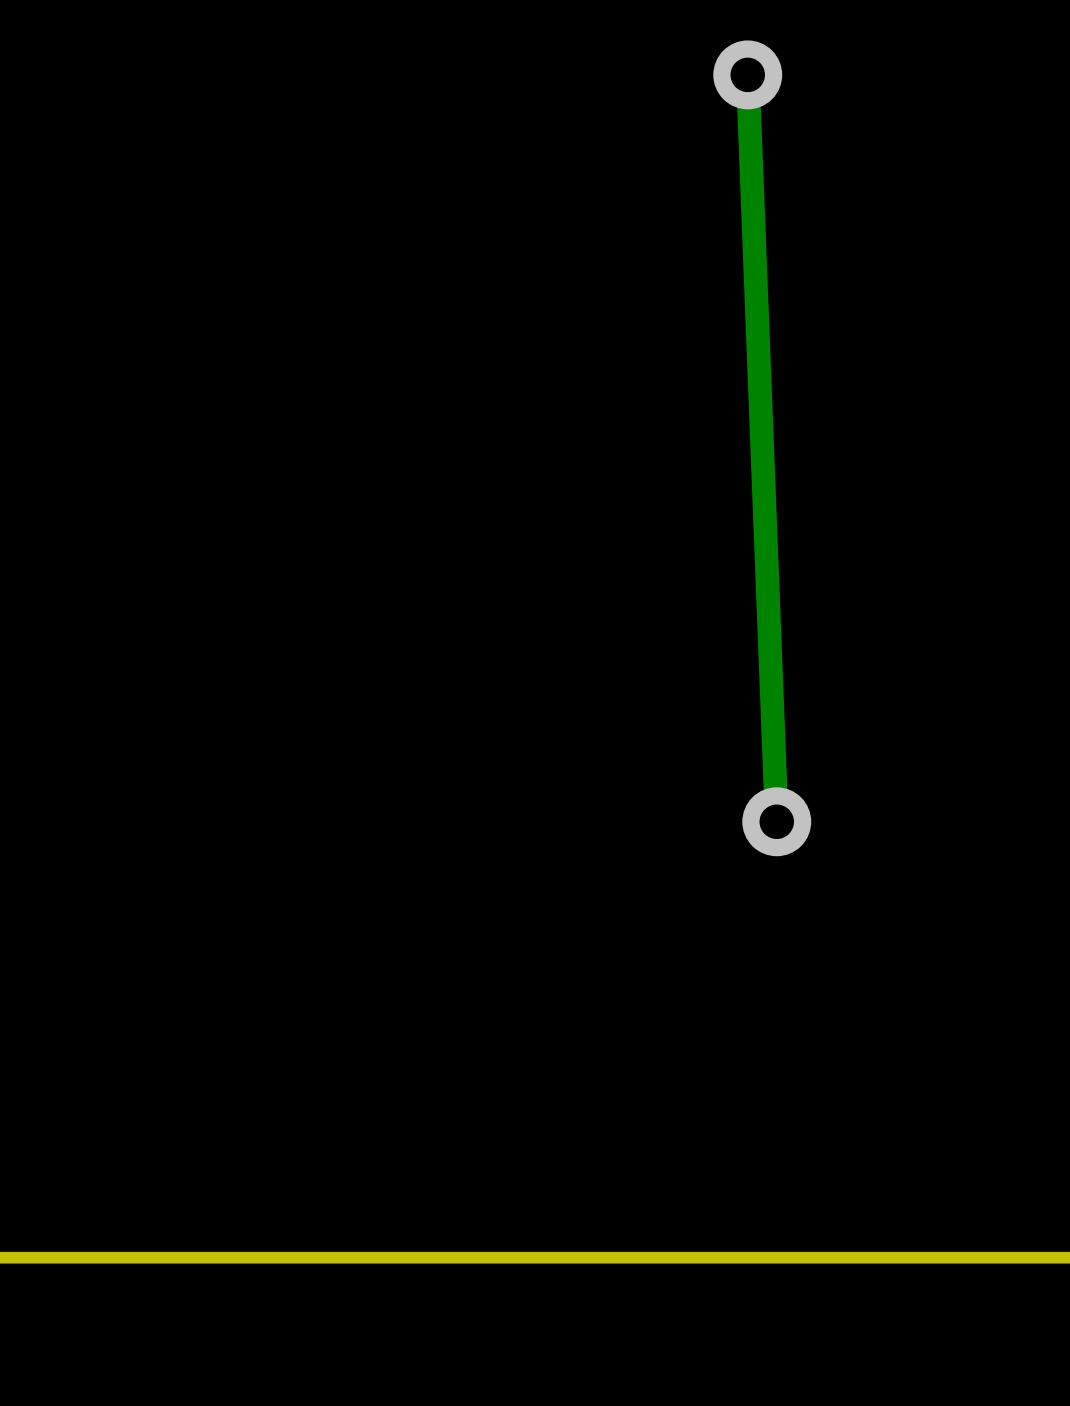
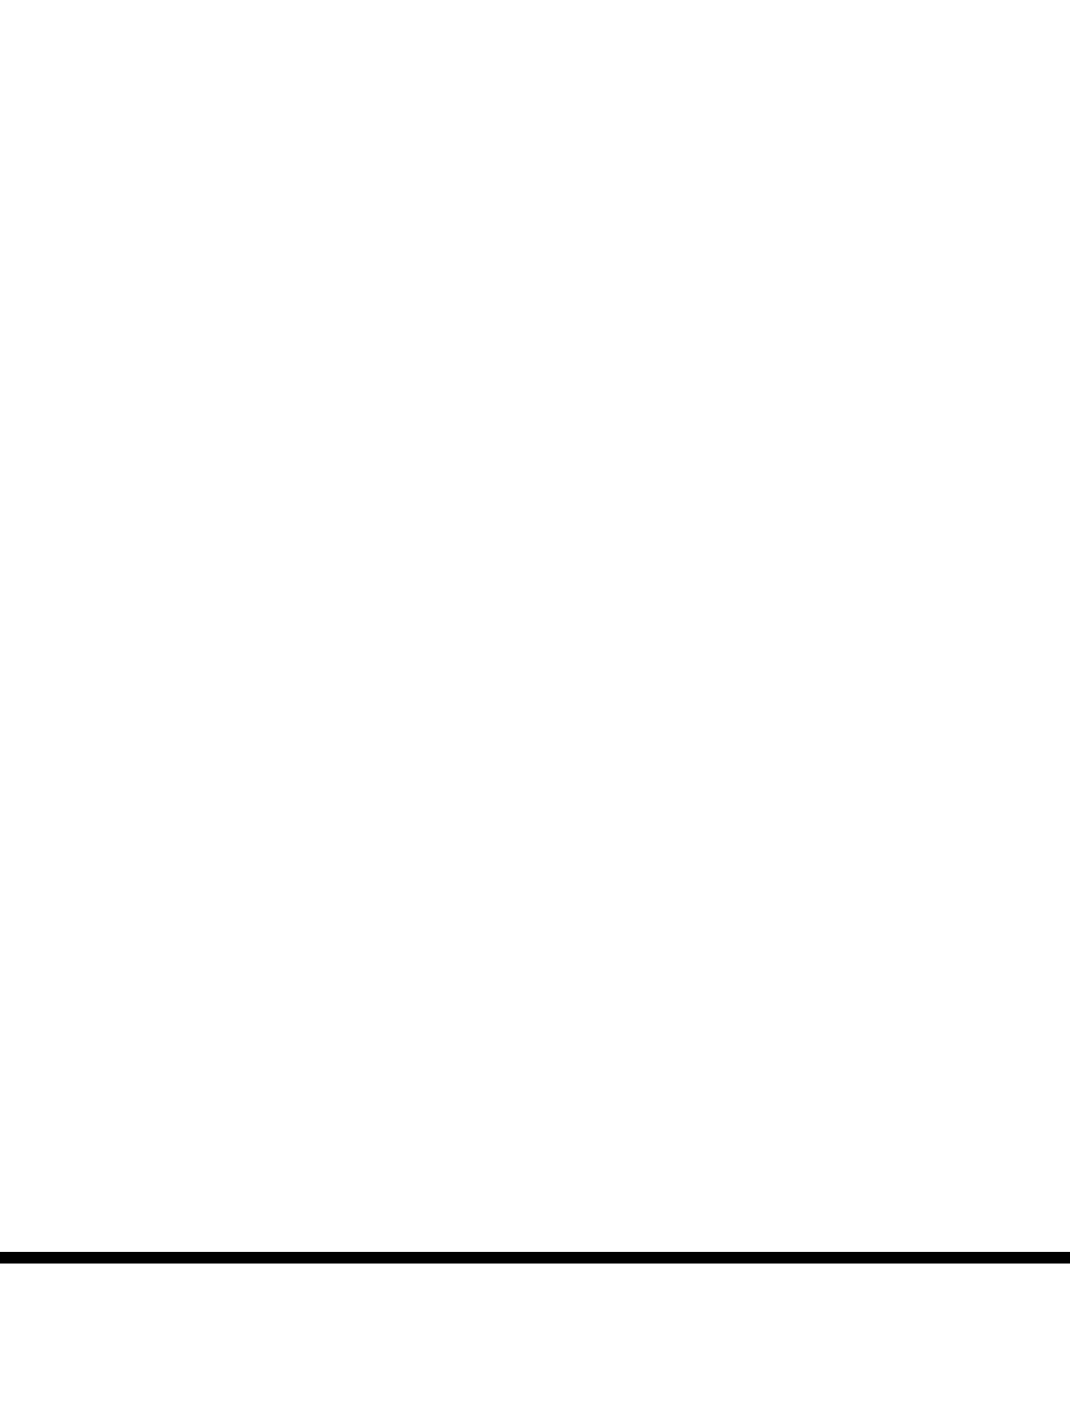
track: (747, 74) (776, 821) -> none
via: (747, 74) -> none
via: (776, 821) -> none

